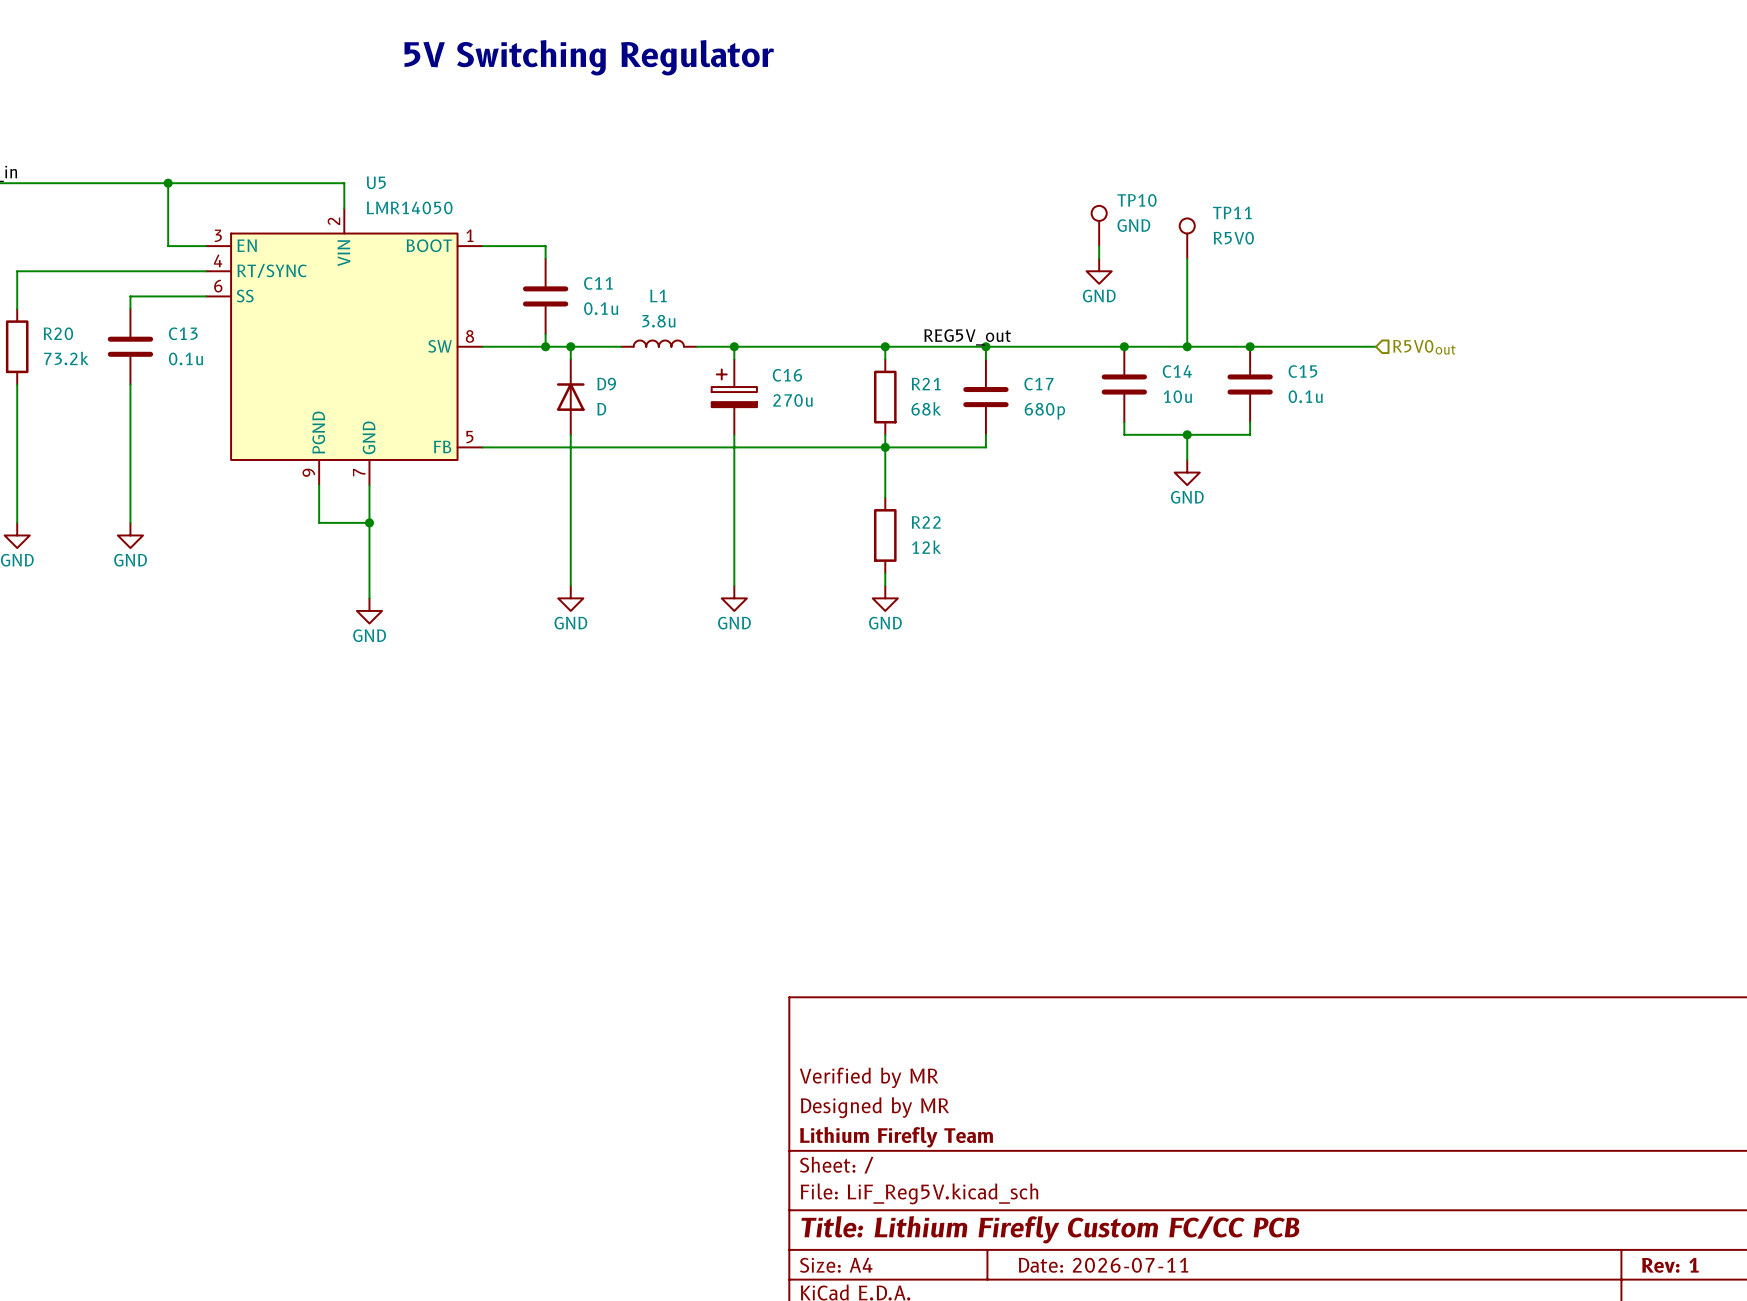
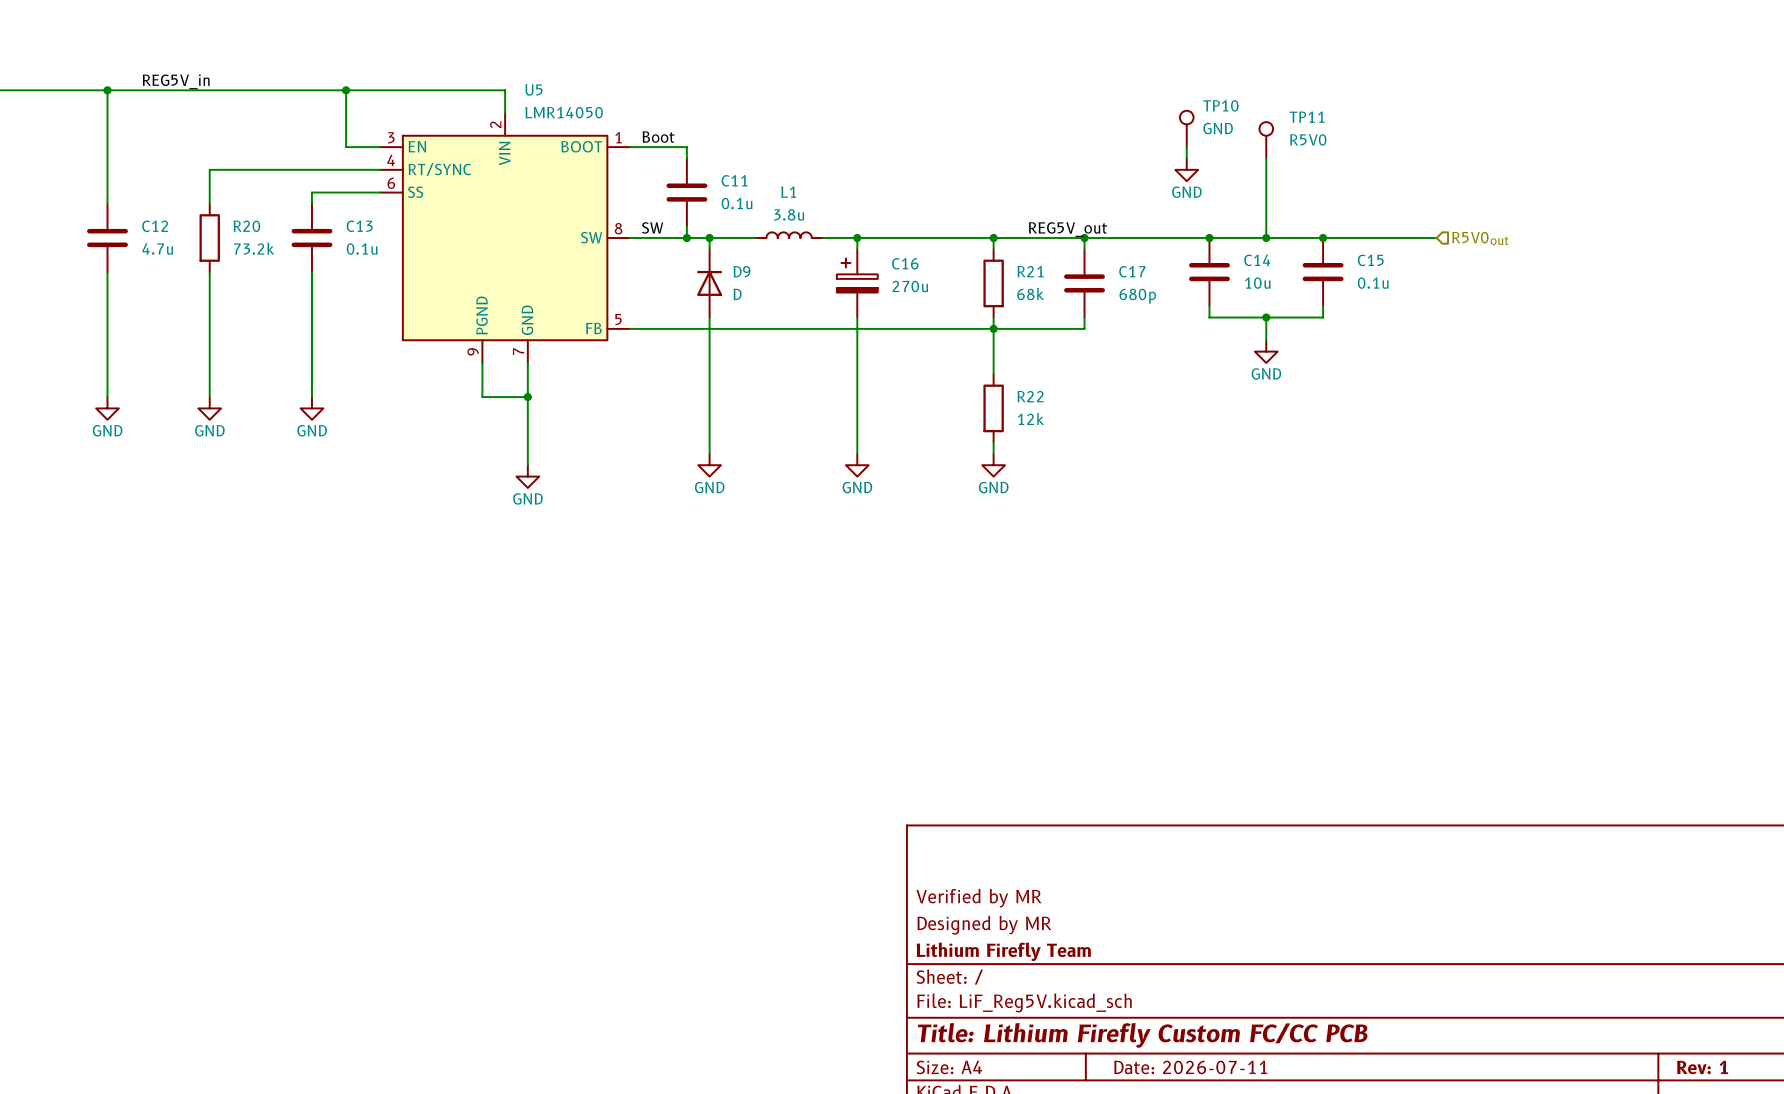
label: none -> Boot (658, 137)
label: none -> SW (652, 227)

